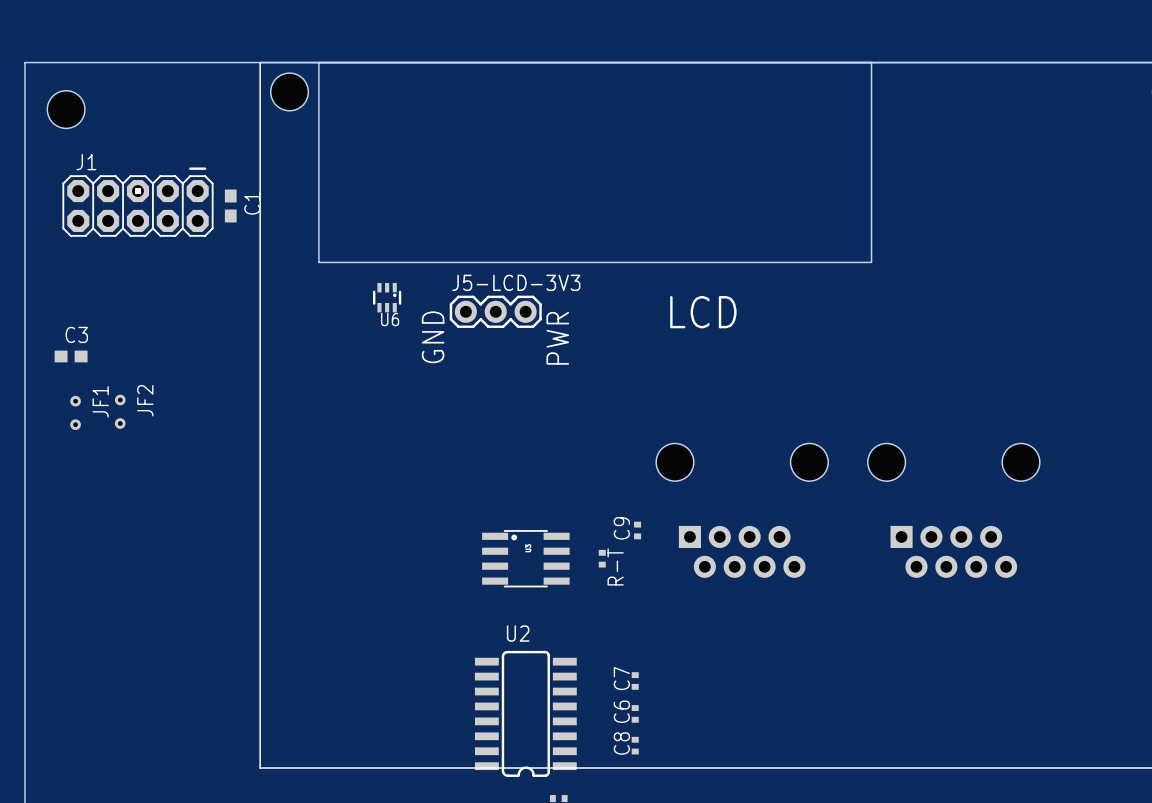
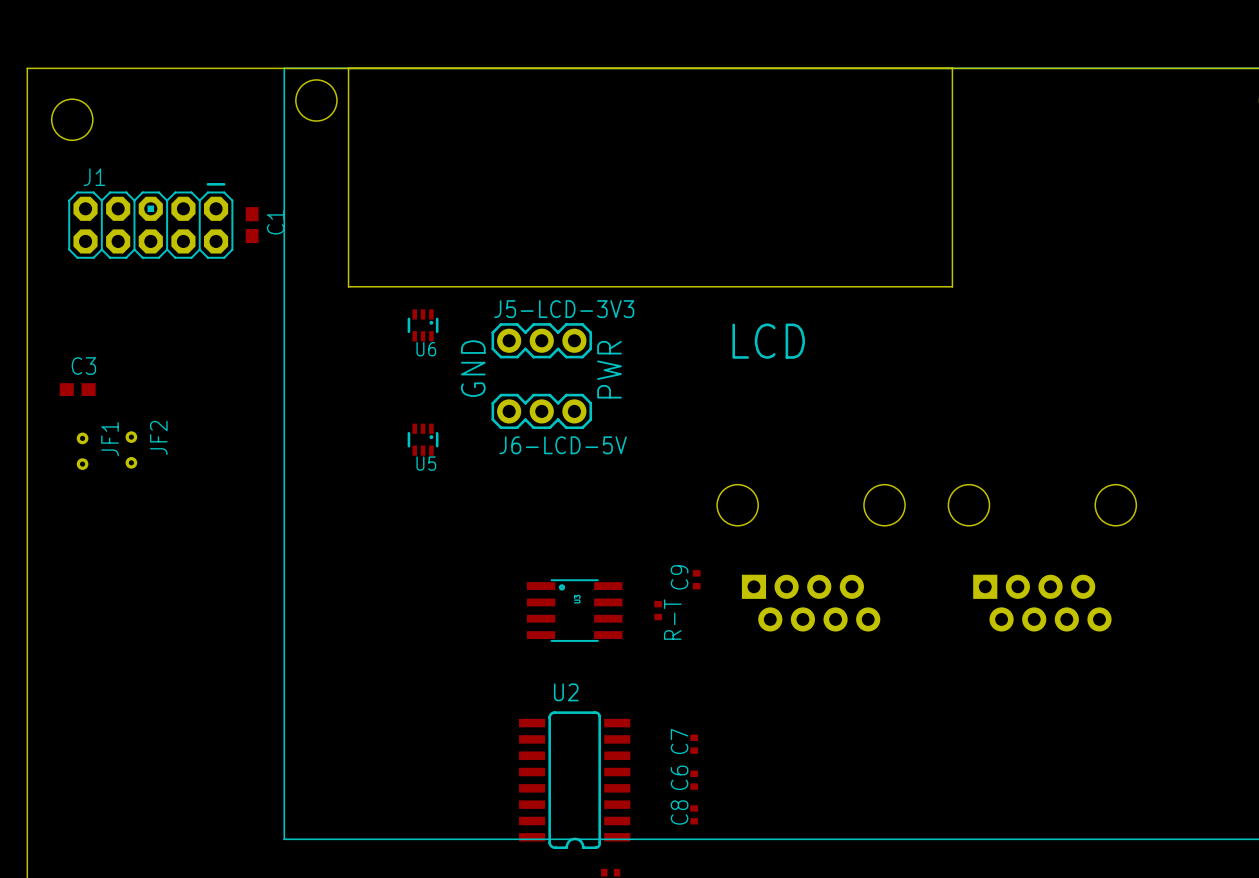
J6-LCD-5V: none -> (541, 411)
U5: none -> (423, 439)

